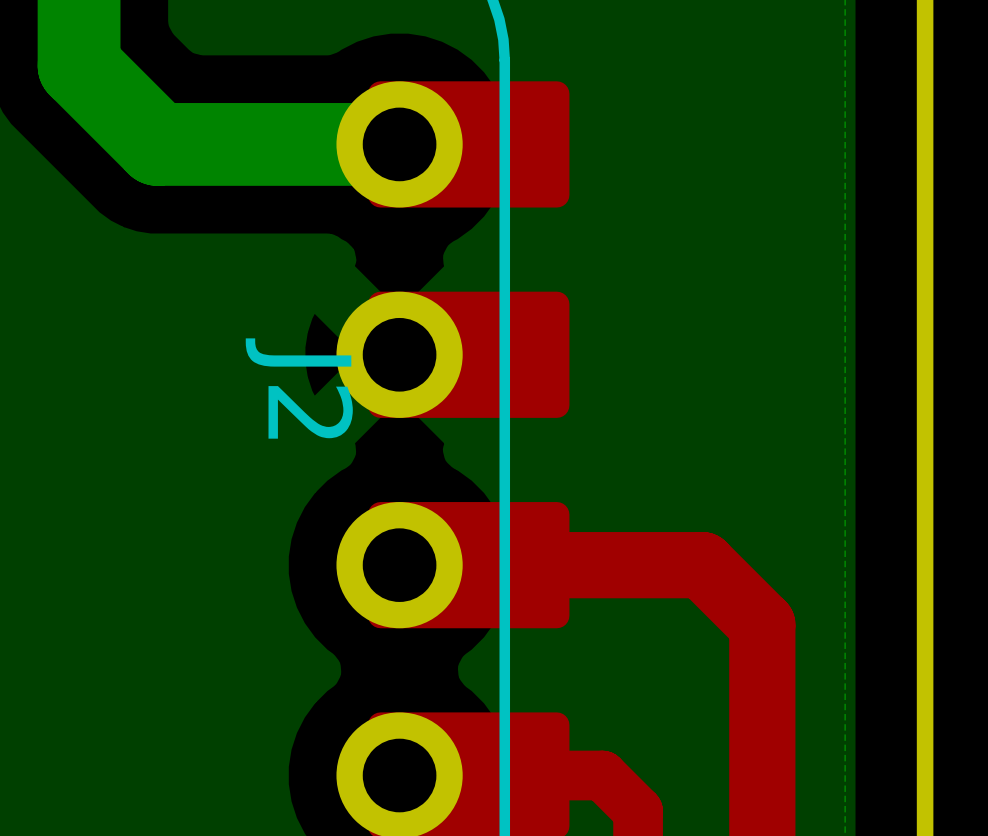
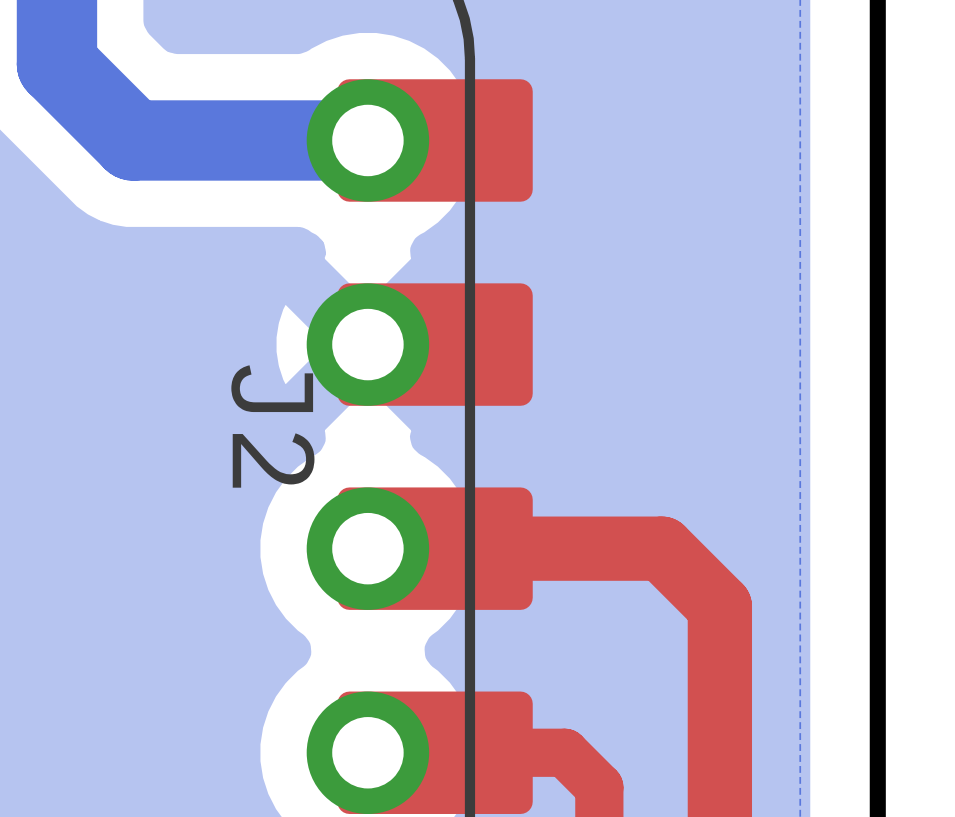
J2 name position: J2 (299, 388) -> J2 (272, 426)

